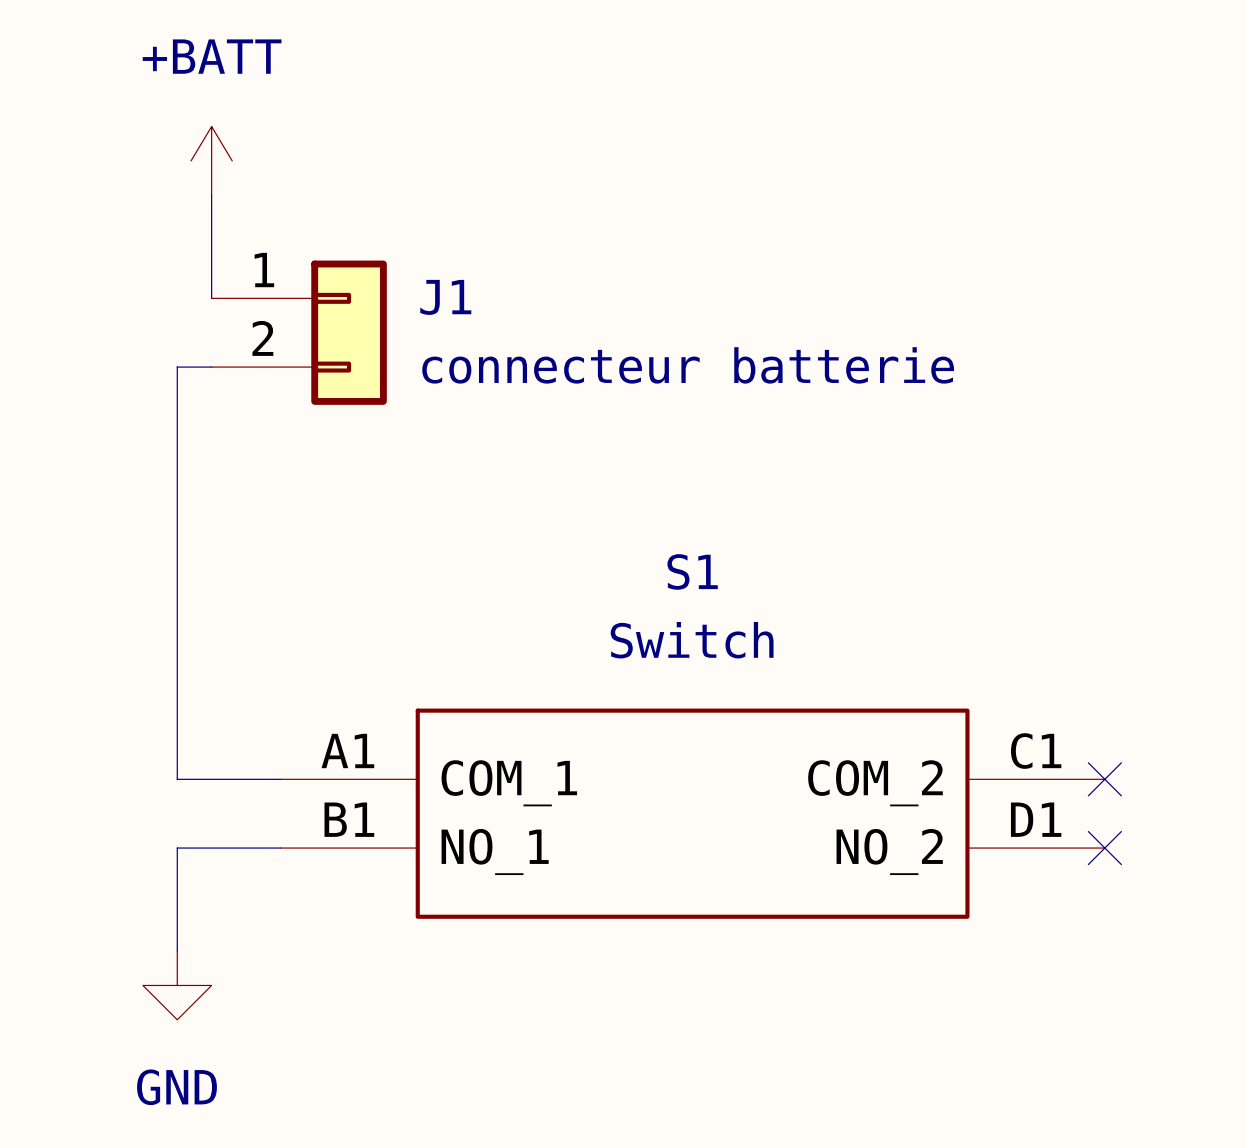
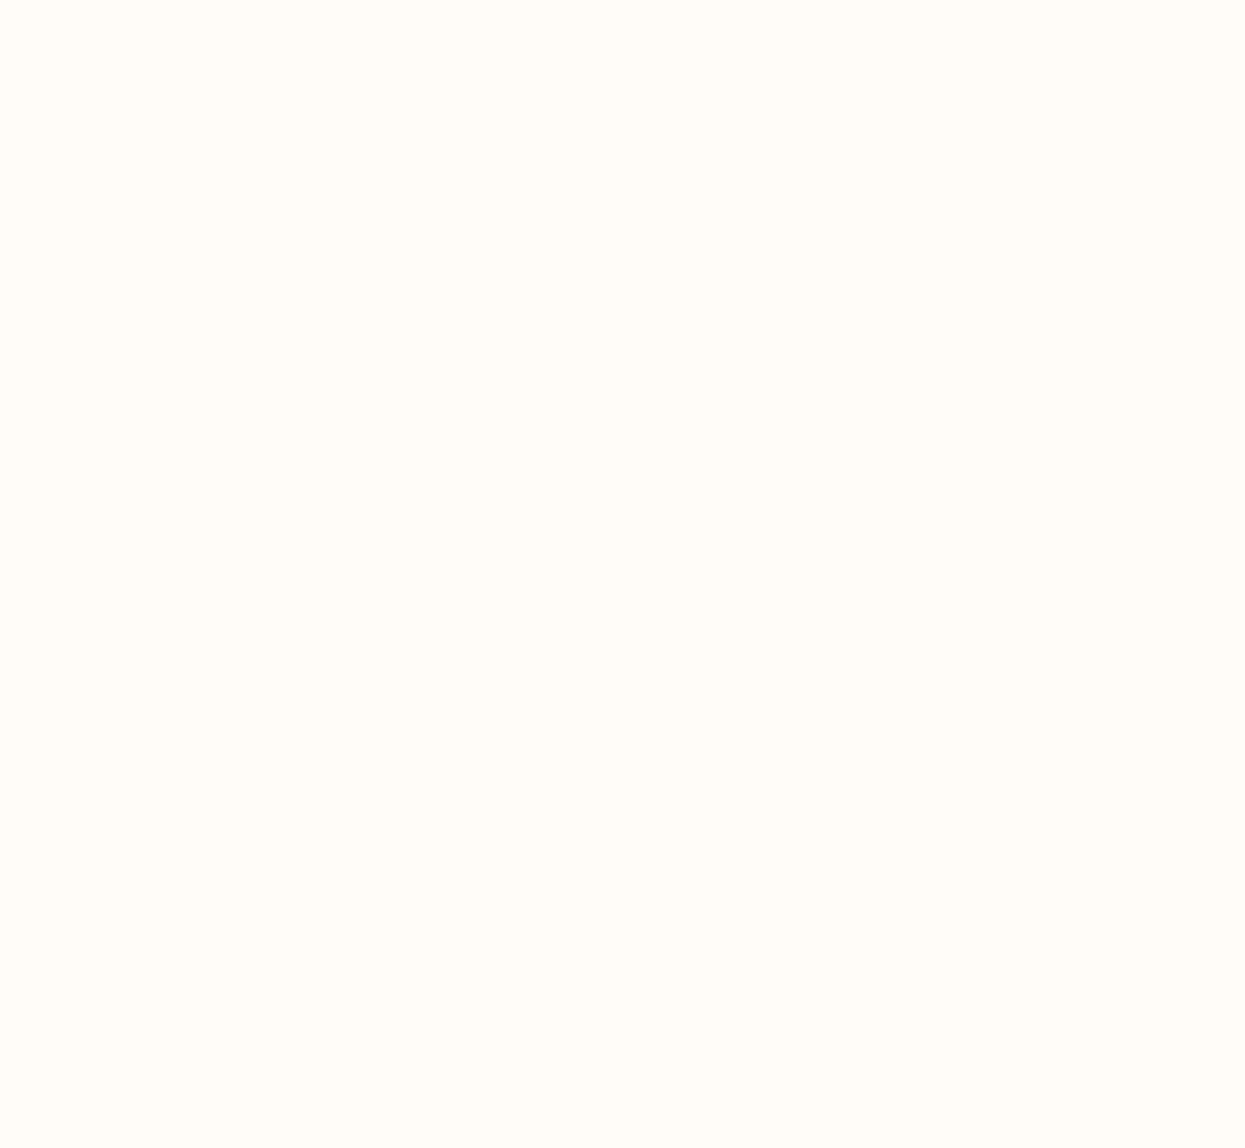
power symbol: +BATT (211, 160) -> none
wire: (211, 195) (211, 298) -> none
J1: connecteur batterie (299, 332) -> none
wire: (211, 367) (177, 367) (177, 779) (280, 779) -> none
no-connect mark: (1104, 779) -> none
S1: Switch (692, 813) -> none
wire: (280, 848) (177, 848) (177, 951) -> none
no-connect mark: (1104, 848) -> none
power symbol: GND (177, 985) -> none

